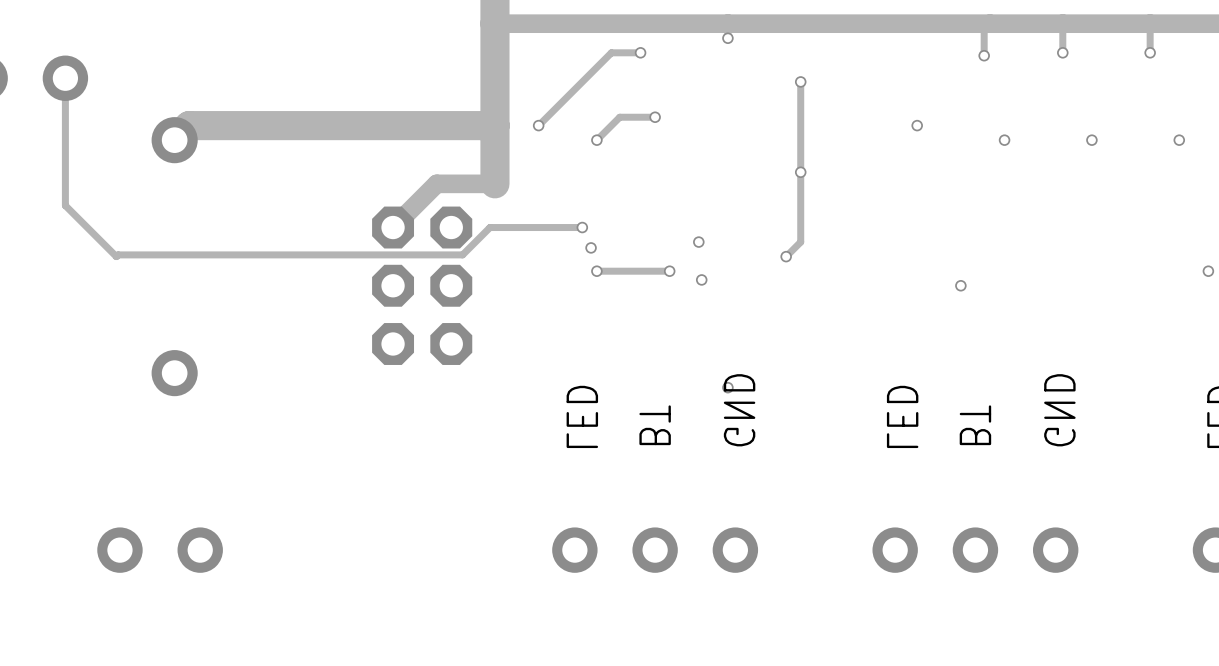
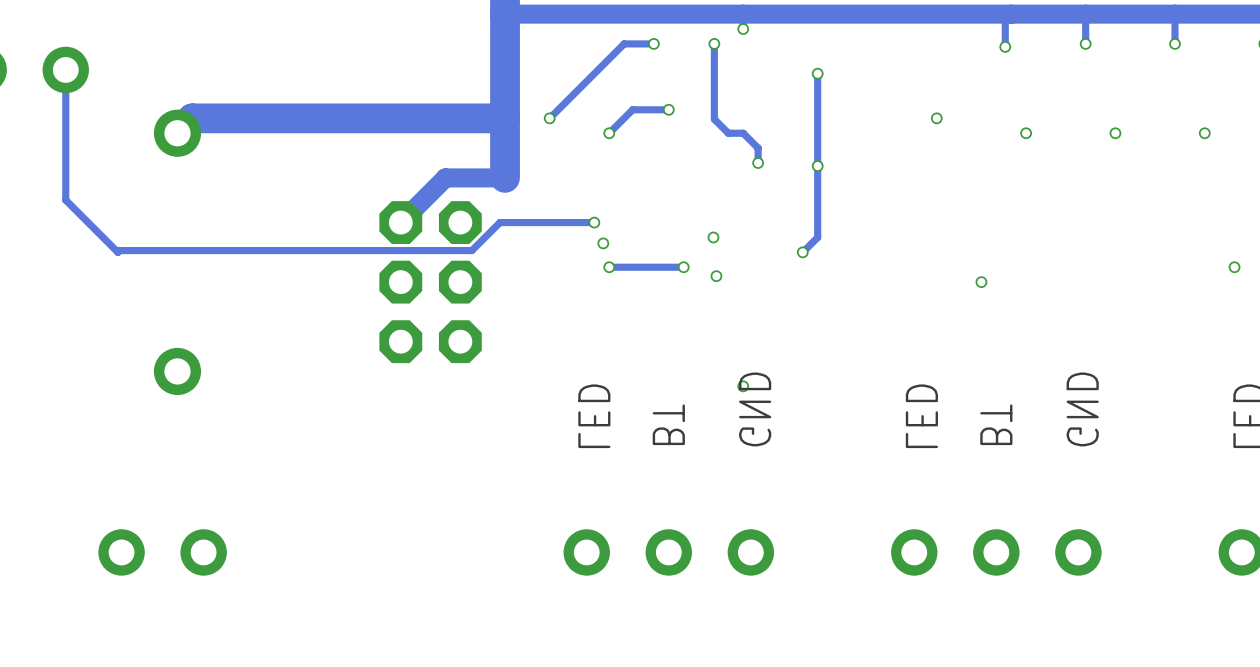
track: none -> (714, 43) (714, 119) (728, 133) (743, 133) (758, 148) (758, 163)
via: none -> (714, 43)
via: none -> (758, 163)

